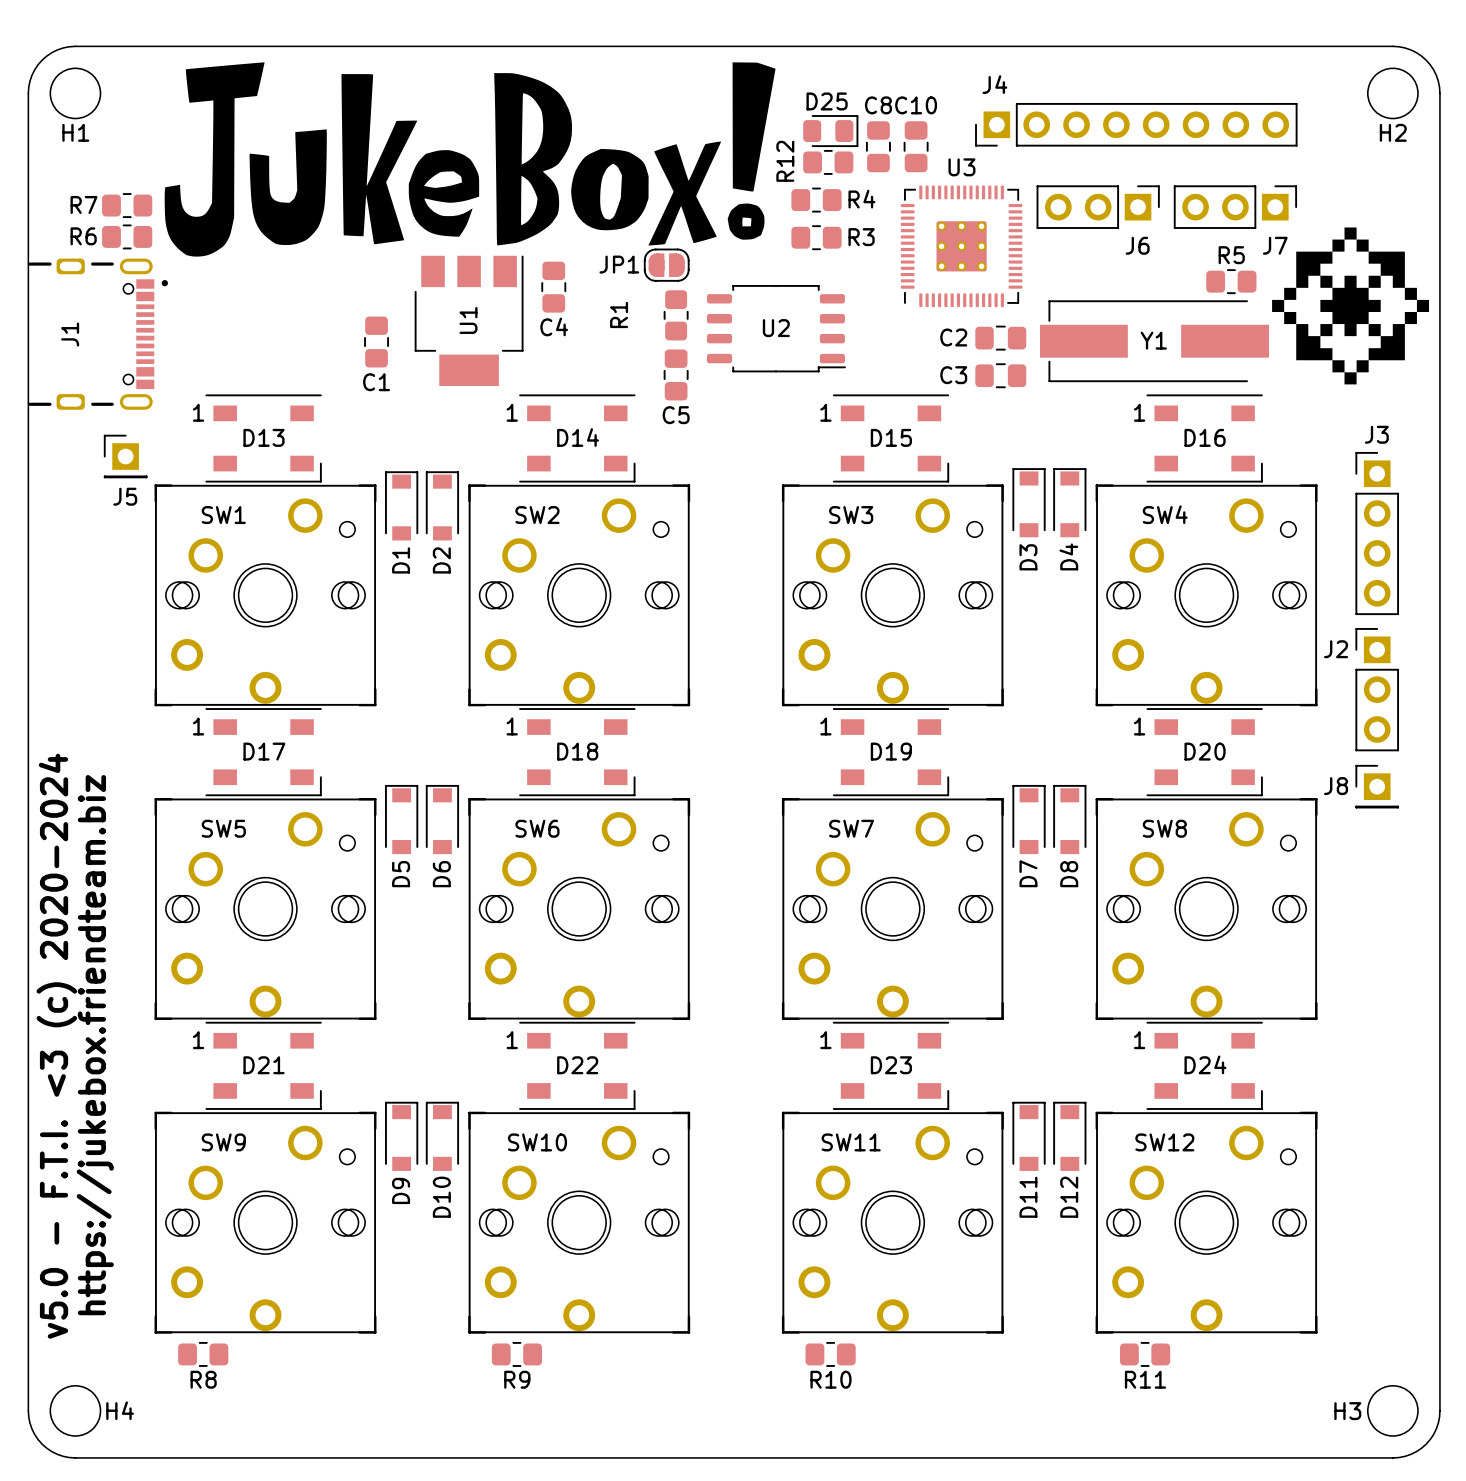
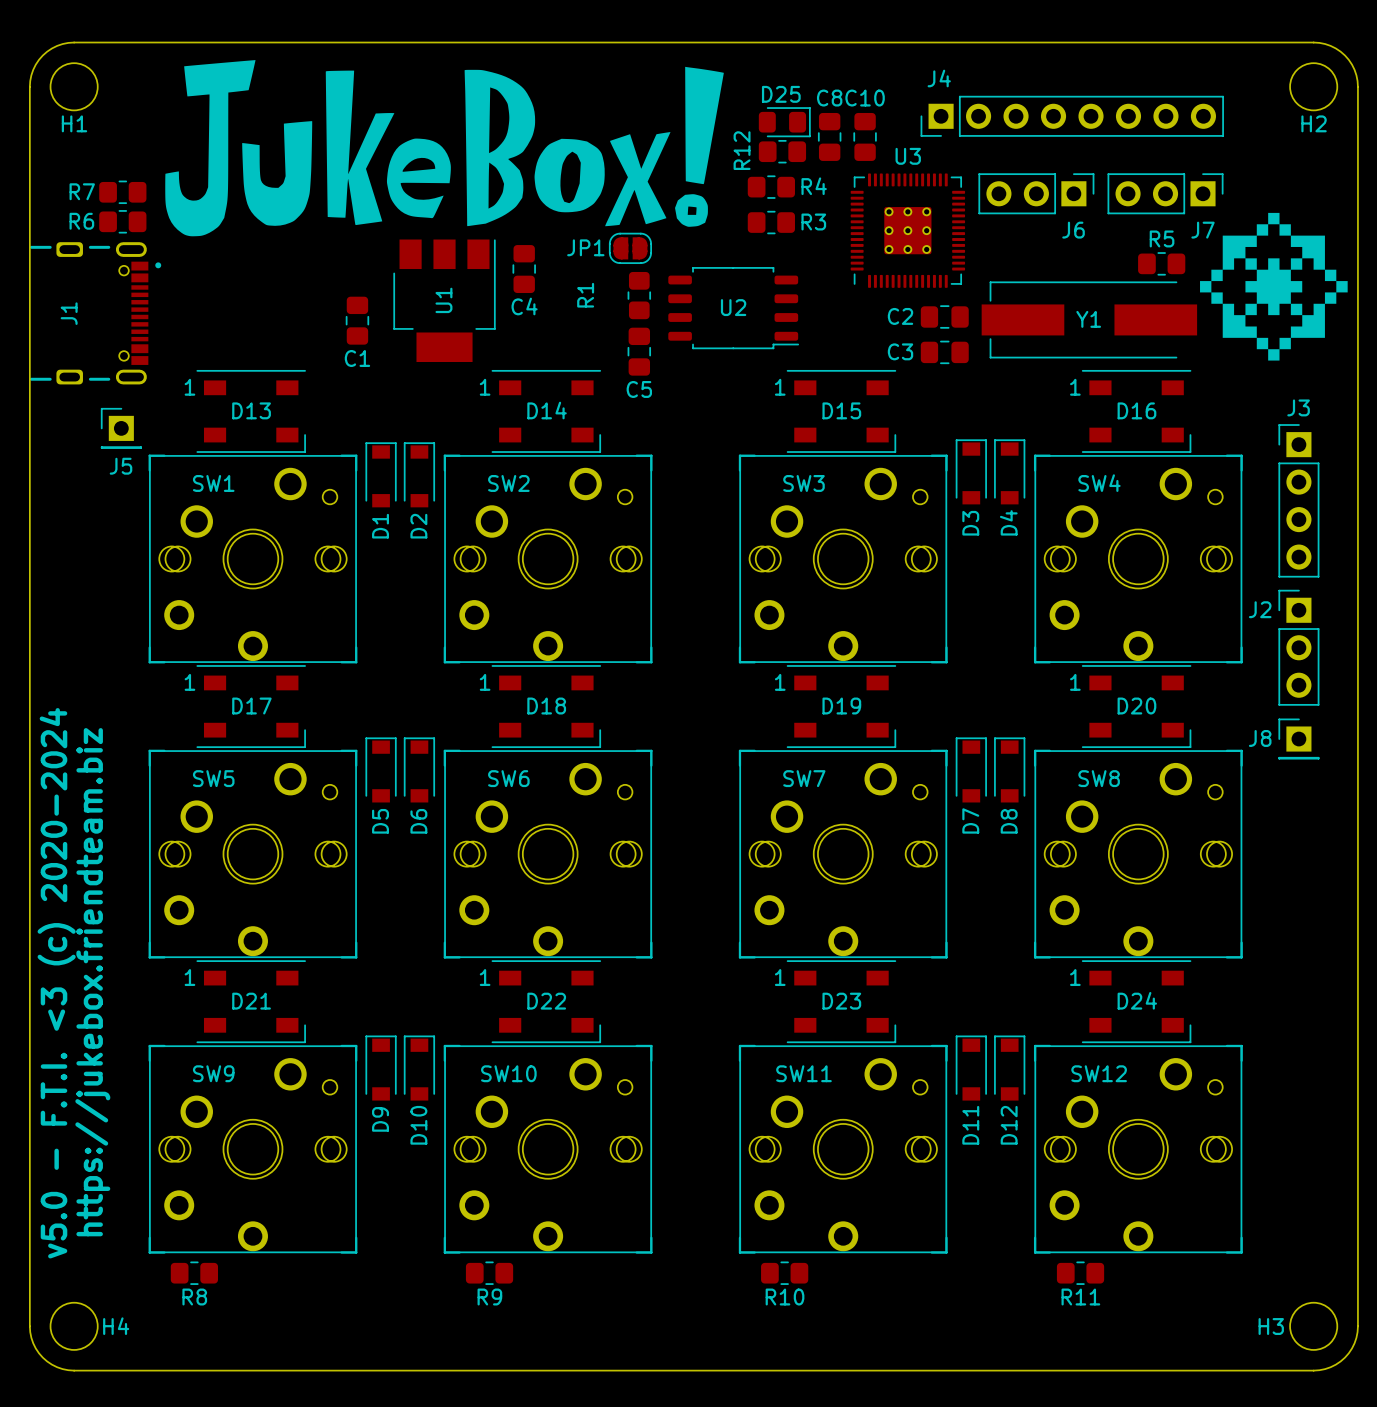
drawing shape: [164, 62, 776, 257] -> [165, 60, 724, 237]

